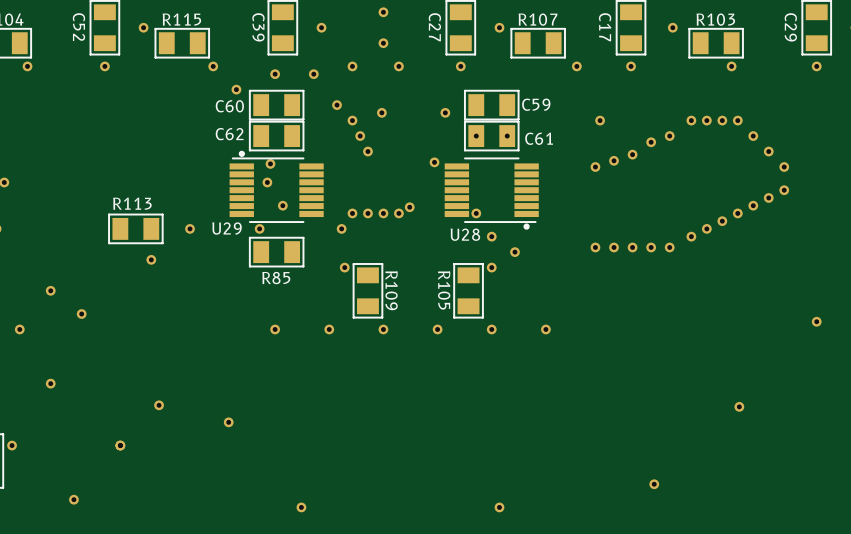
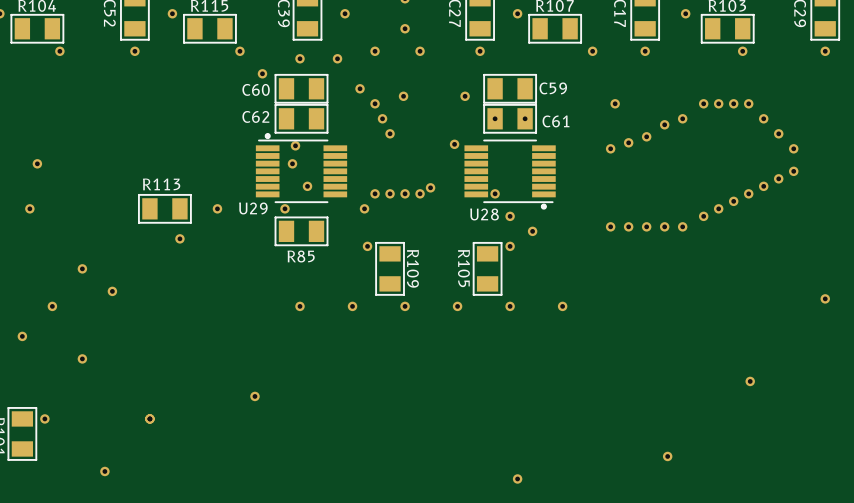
part: (159, 405) -> none
part: (301, 507) -> none

